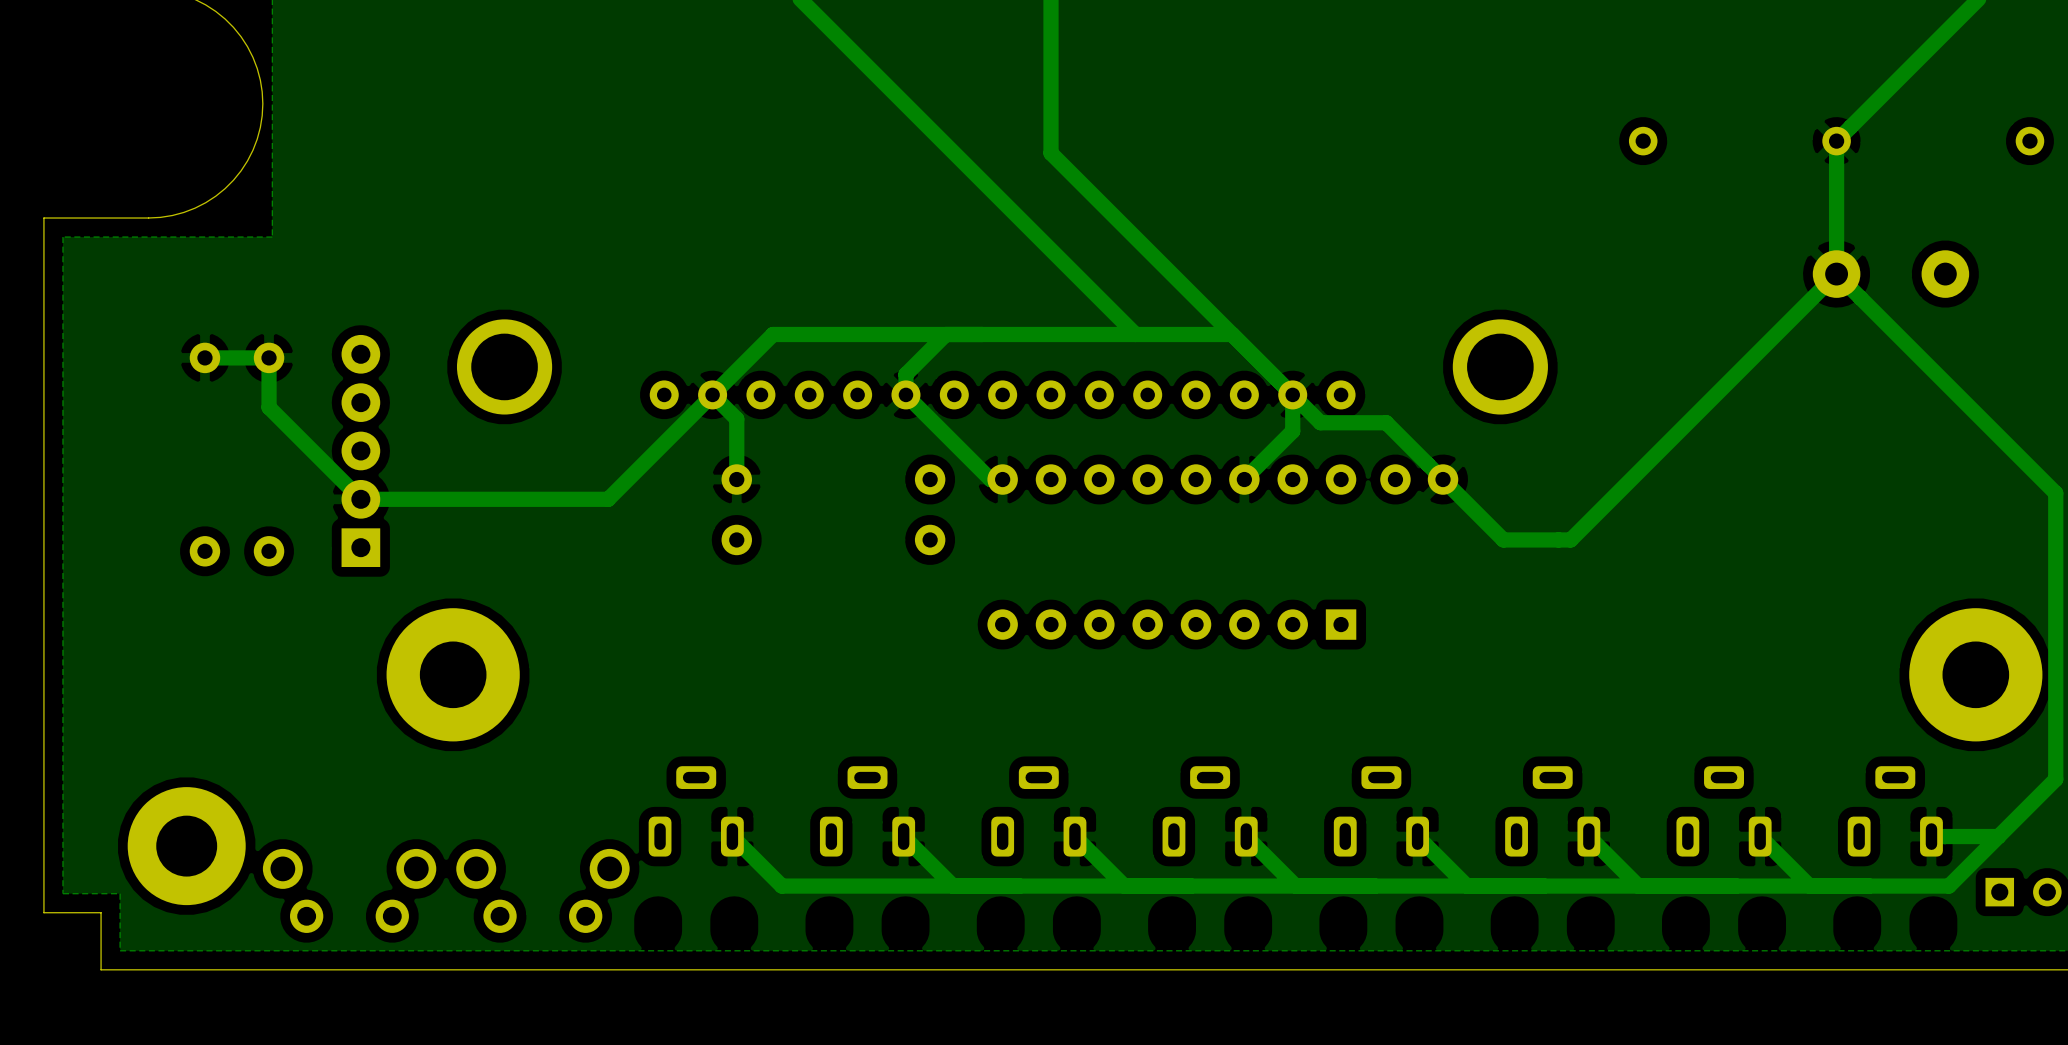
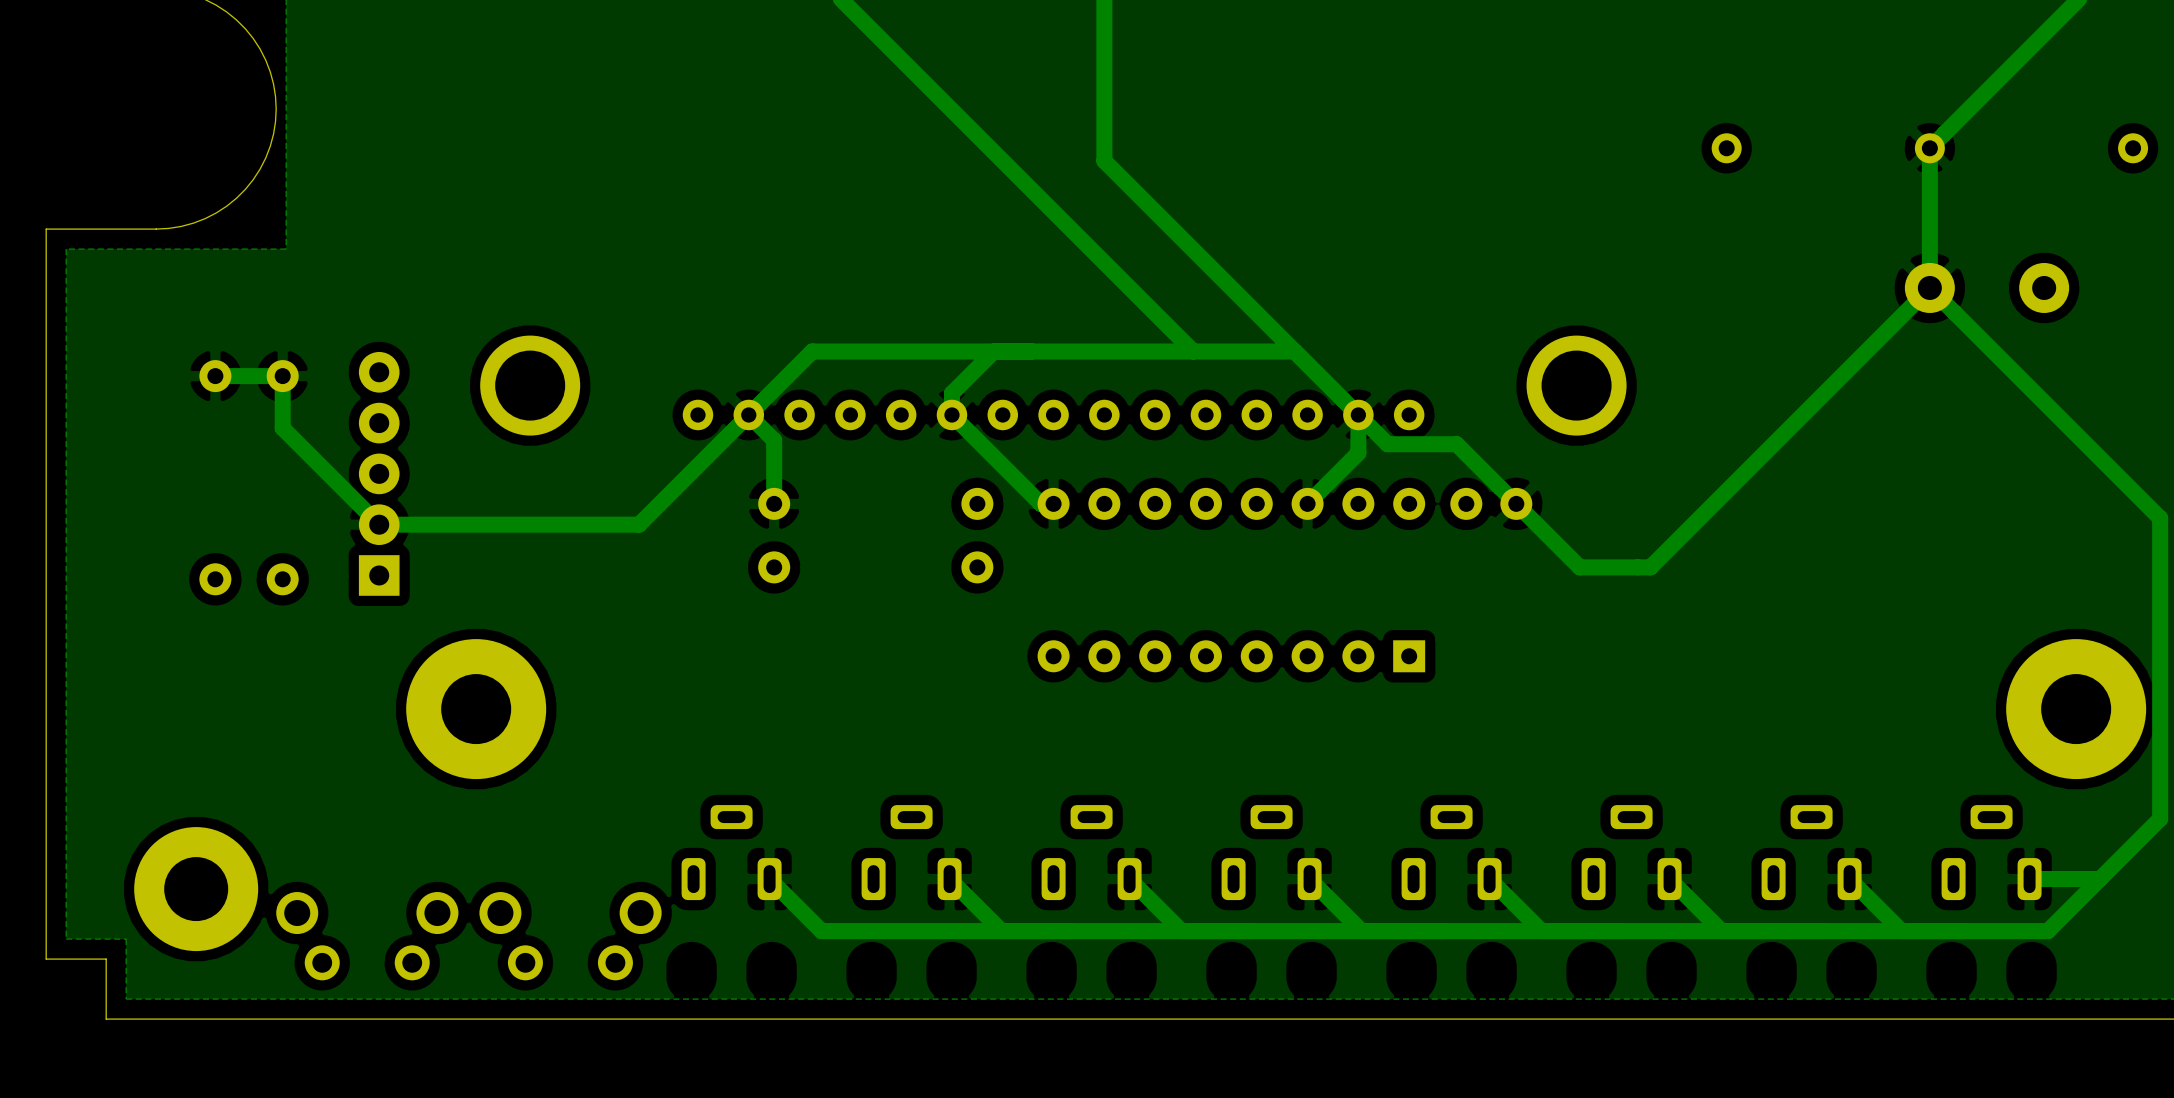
part: (2023, 892) -> none

